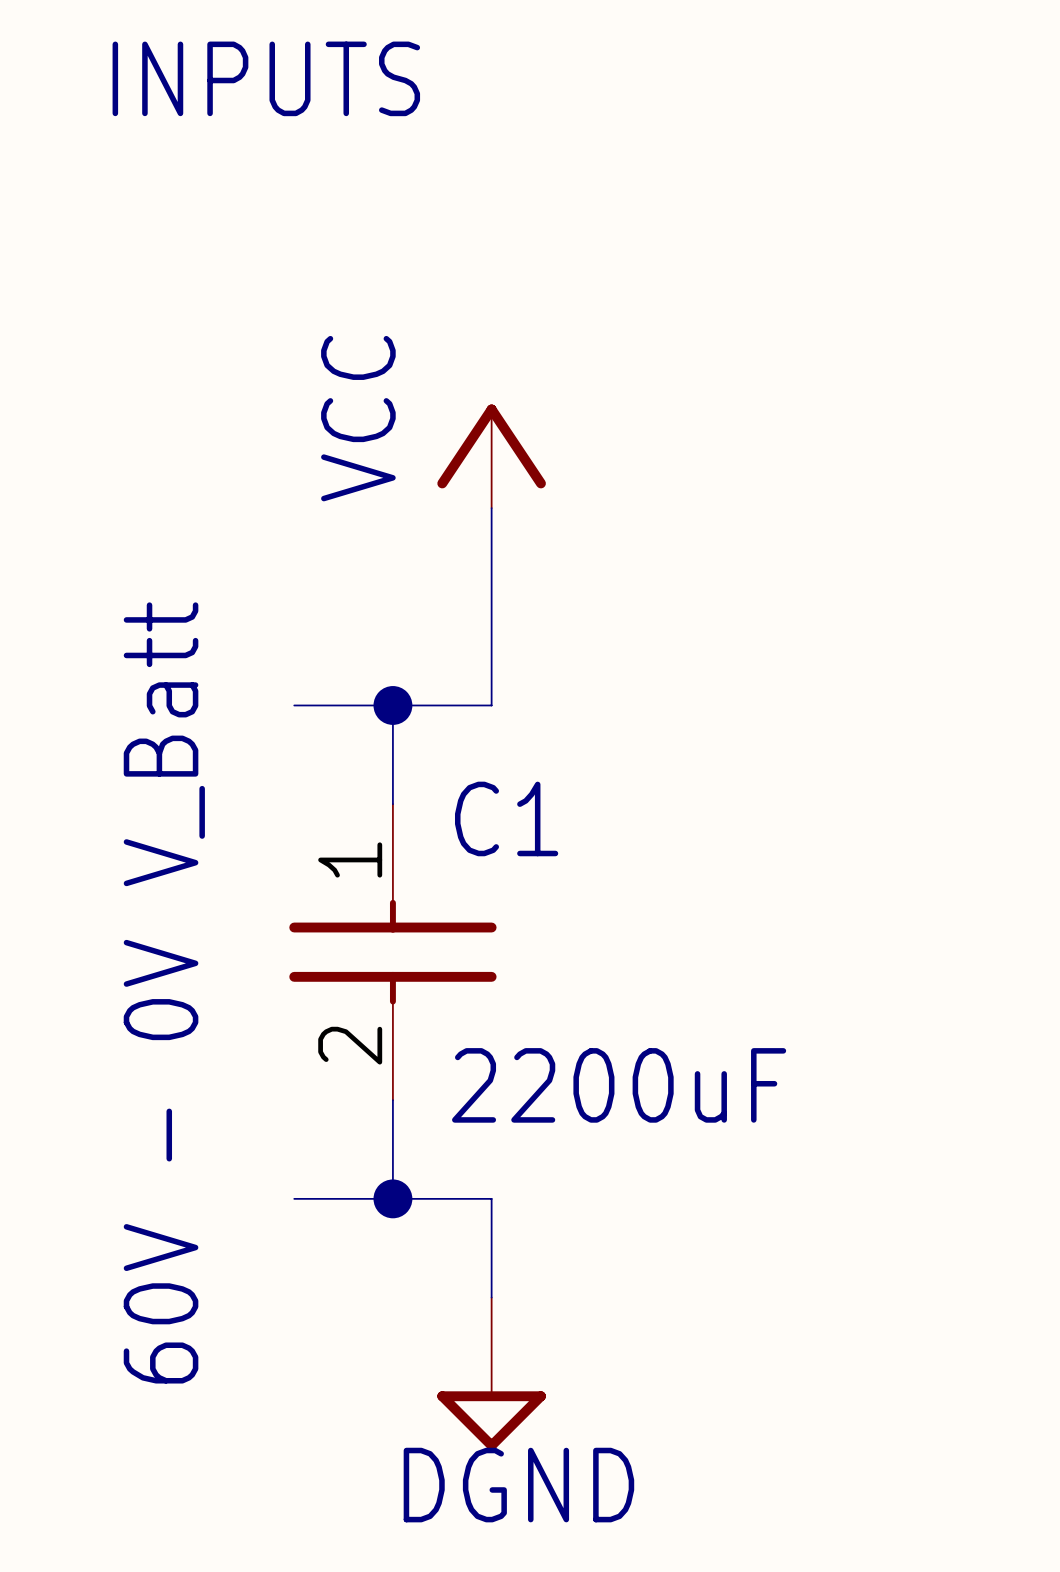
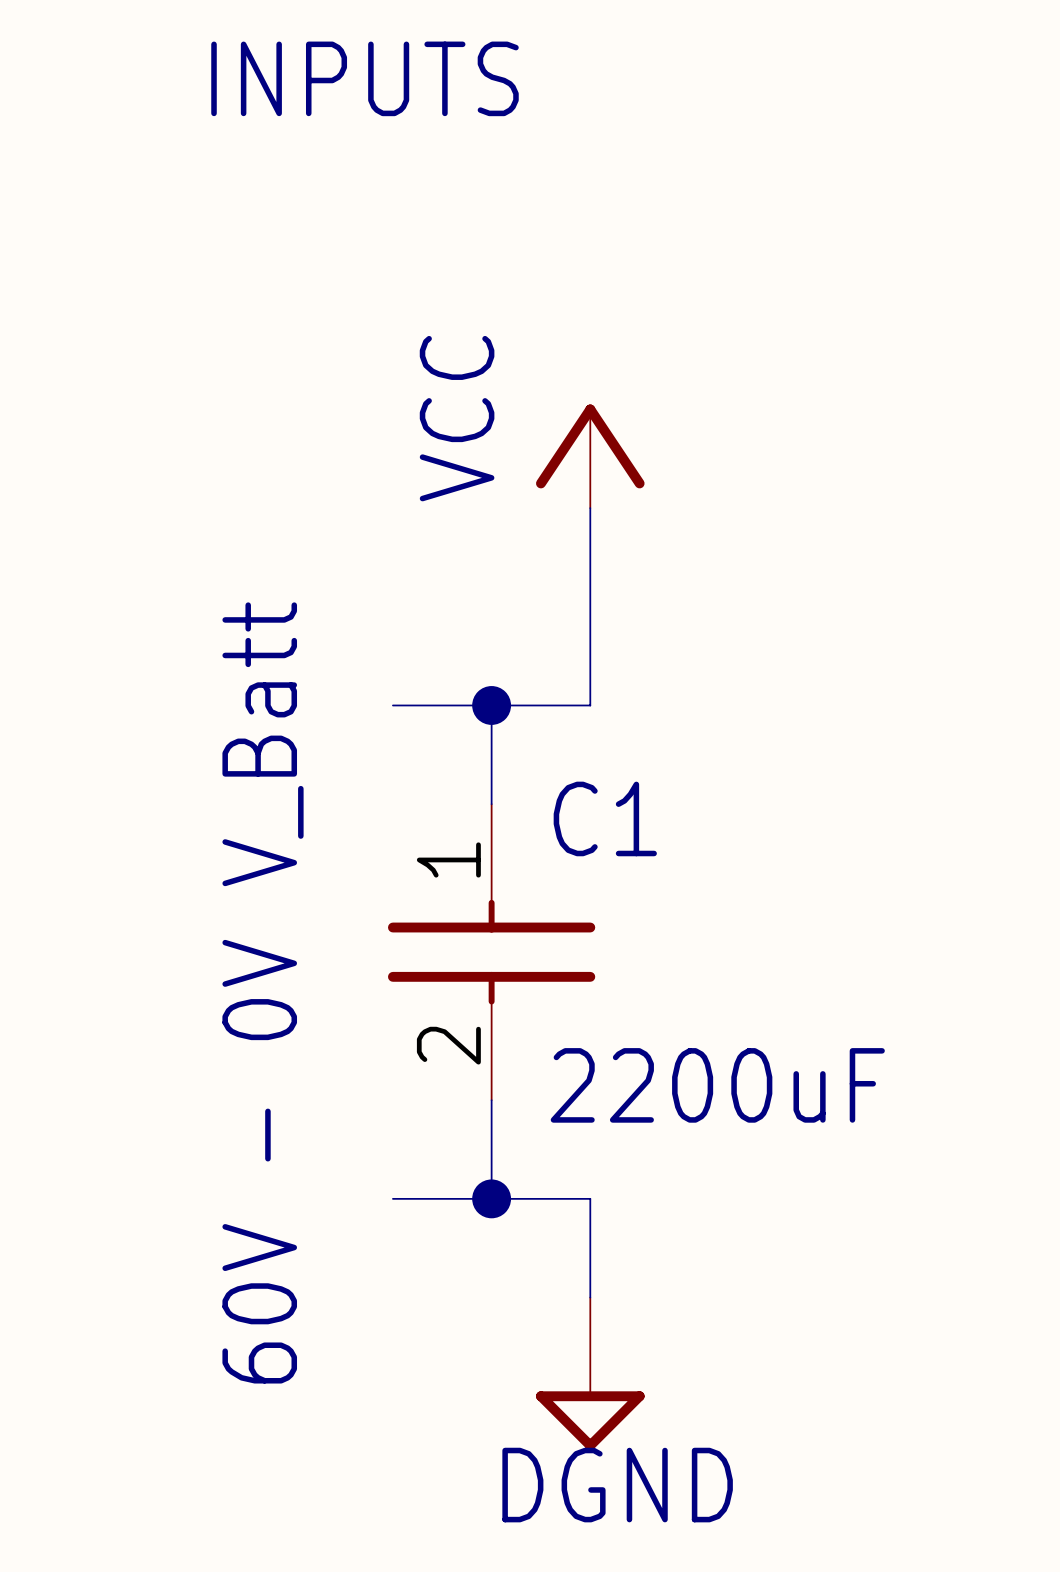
text position: INPUTS (266, 78) -> INPUTS (364, 78)
power symbol position: VCC (491, 456) -> VCC (590, 456)
wire: (491, 508) (491, 705) -> none
wire: none -> (590, 508) (590, 705) (491, 705) (491, 804)
wire: (294, 705) (392, 705) (392, 804) -> none
junction position: (392, 705) -> (491, 705)
C1 position: (392, 952) -> (491, 952)
text position: 60V - 0V V_Batt (164, 992) -> 60V - 0V V_Batt (263, 992)
wire: (392, 1100) (392, 1198) (294, 1198) -> none
wire: none -> (491, 1100) (491, 1198) (590, 1198) (590, 1297)
junction position: (392, 1198) -> (491, 1198)
wire: (491, 1198) (491, 1297) -> none
power symbol position: DGND (491, 1374) -> DGND (590, 1374)

